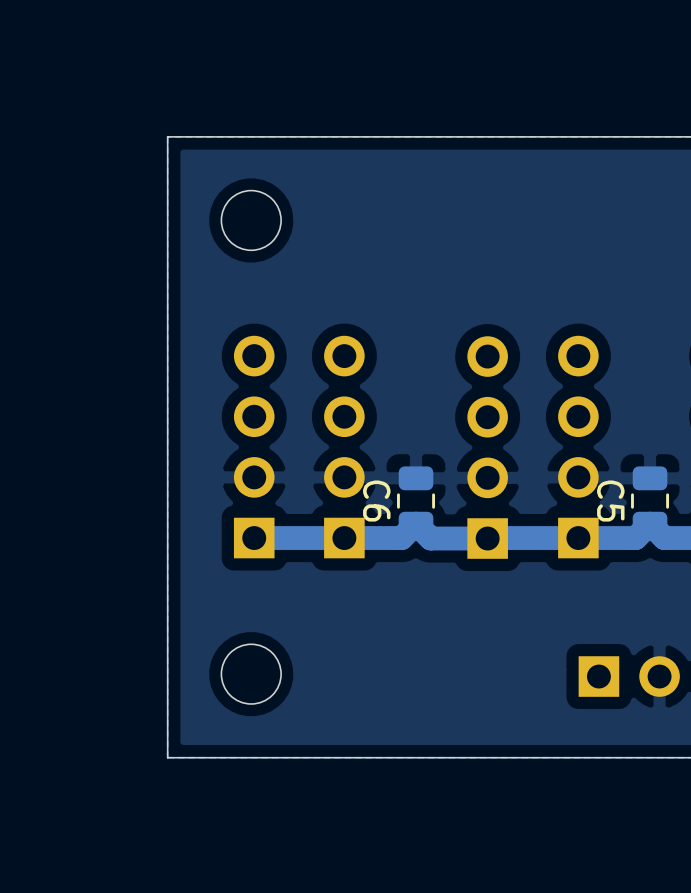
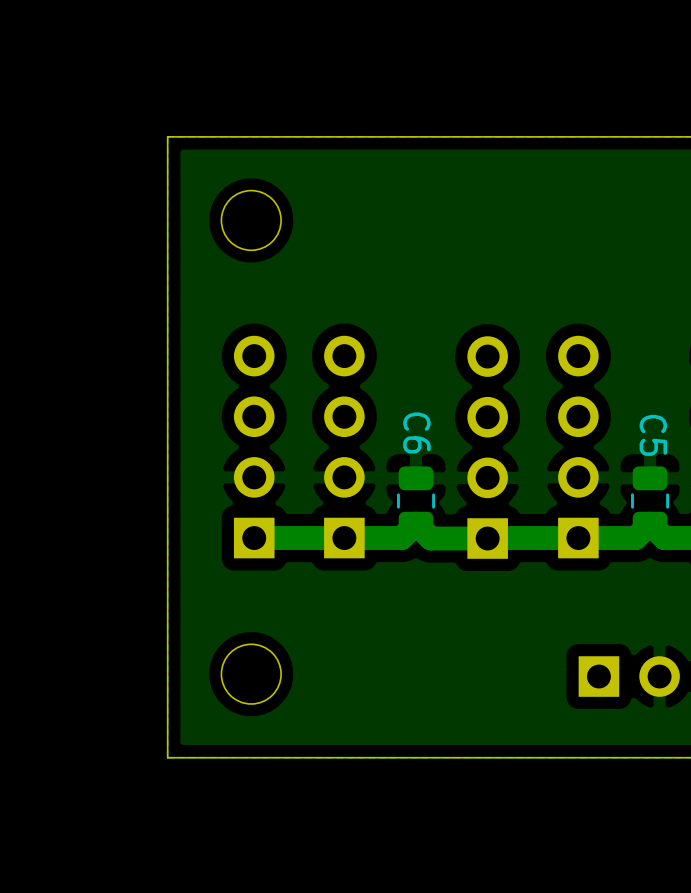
C6 name position: C6 (376, 501) -> C6 (416, 432)
C5 name position: C5 (610, 501) -> C5 (653, 435)

